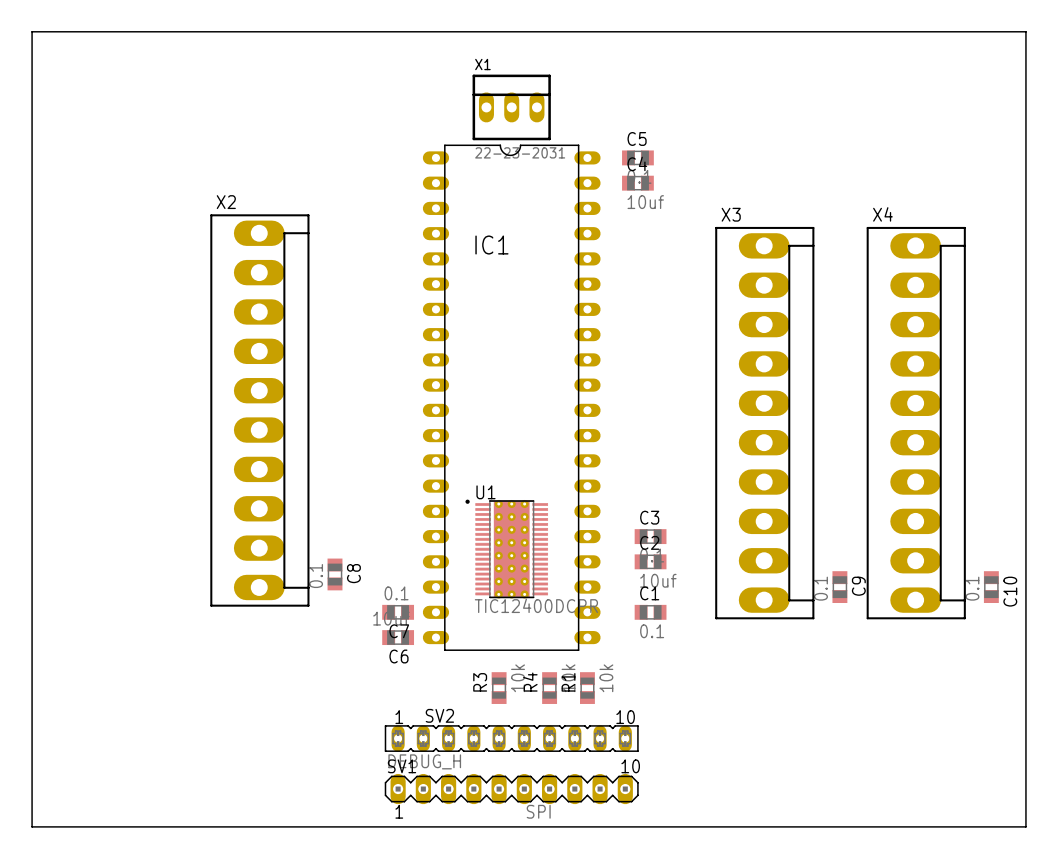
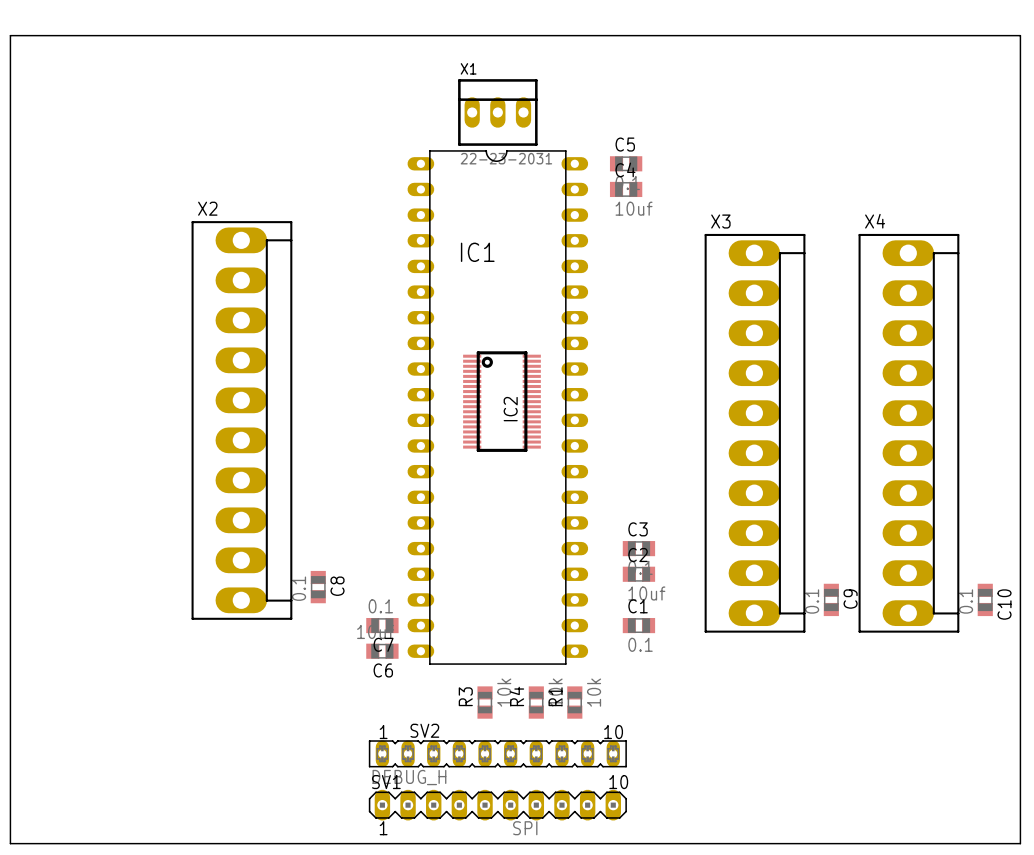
IC2: none -> (501, 401)
U1: TIC12400DCPR (506, 549) -> none

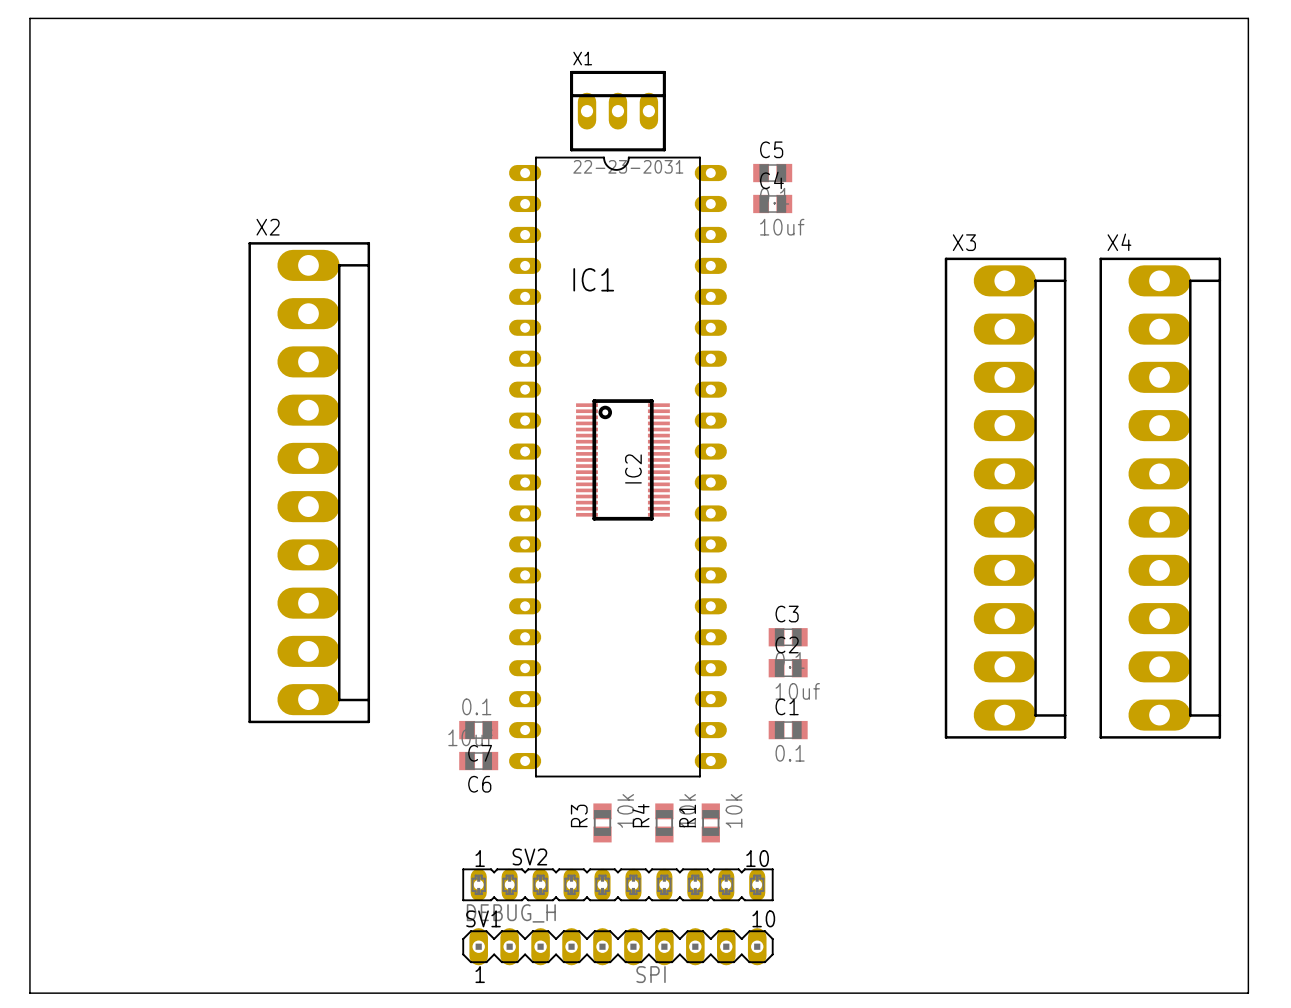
X3 position: (755, 433) -> (1005, 498)
X4 position: (908, 433) -> (1160, 498)
C8: 0.1 (318, 587) -> none
C9: 0.1 (831, 599) -> none
C10: 0.1 (985, 599) -> none

